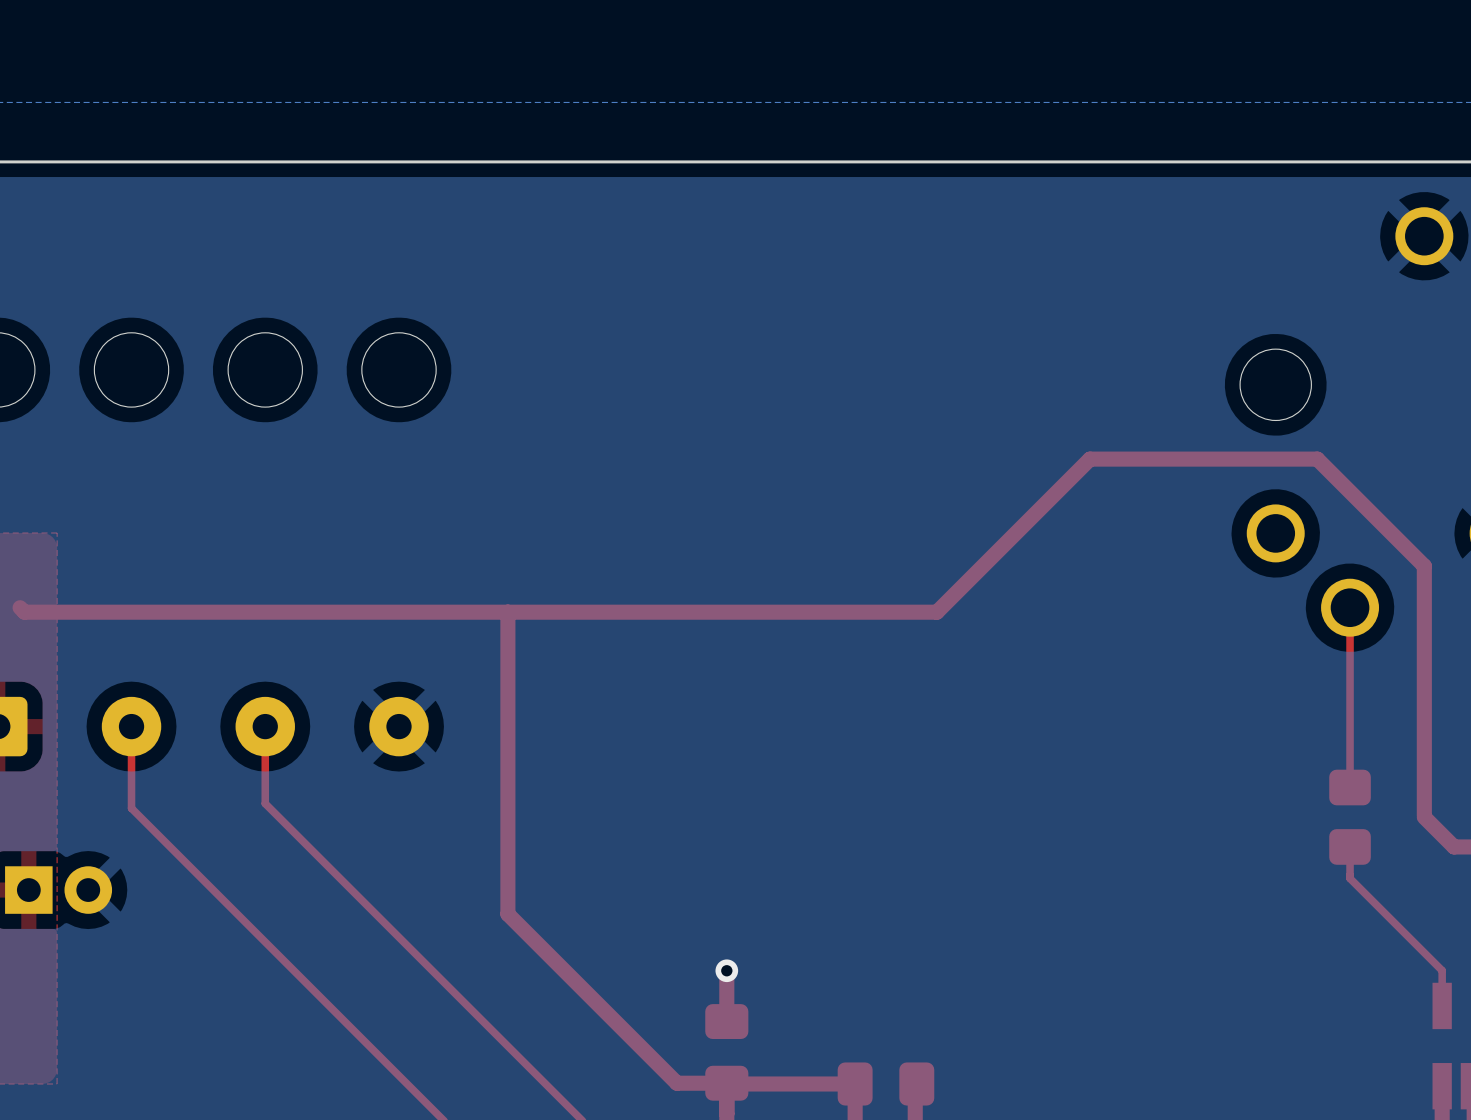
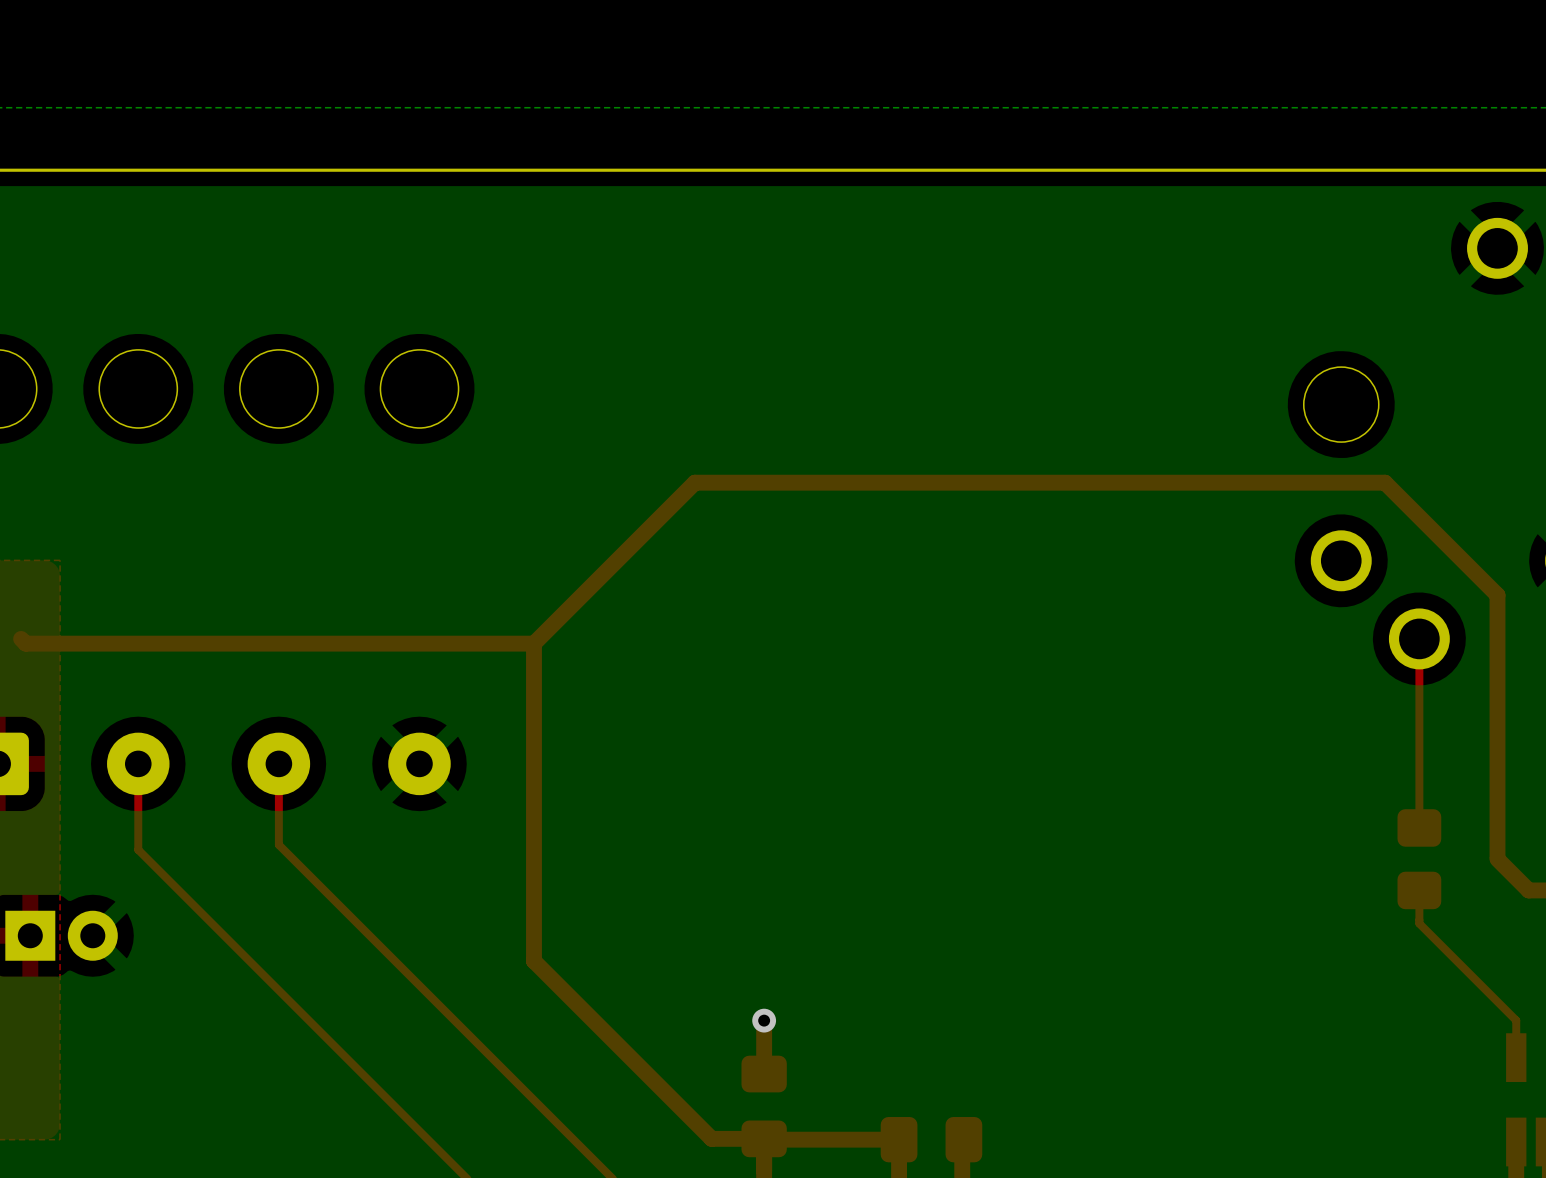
top track: (1089, 459) (936, 612) (507, 612) -> (1145, 482) (694, 482) (533, 643)

